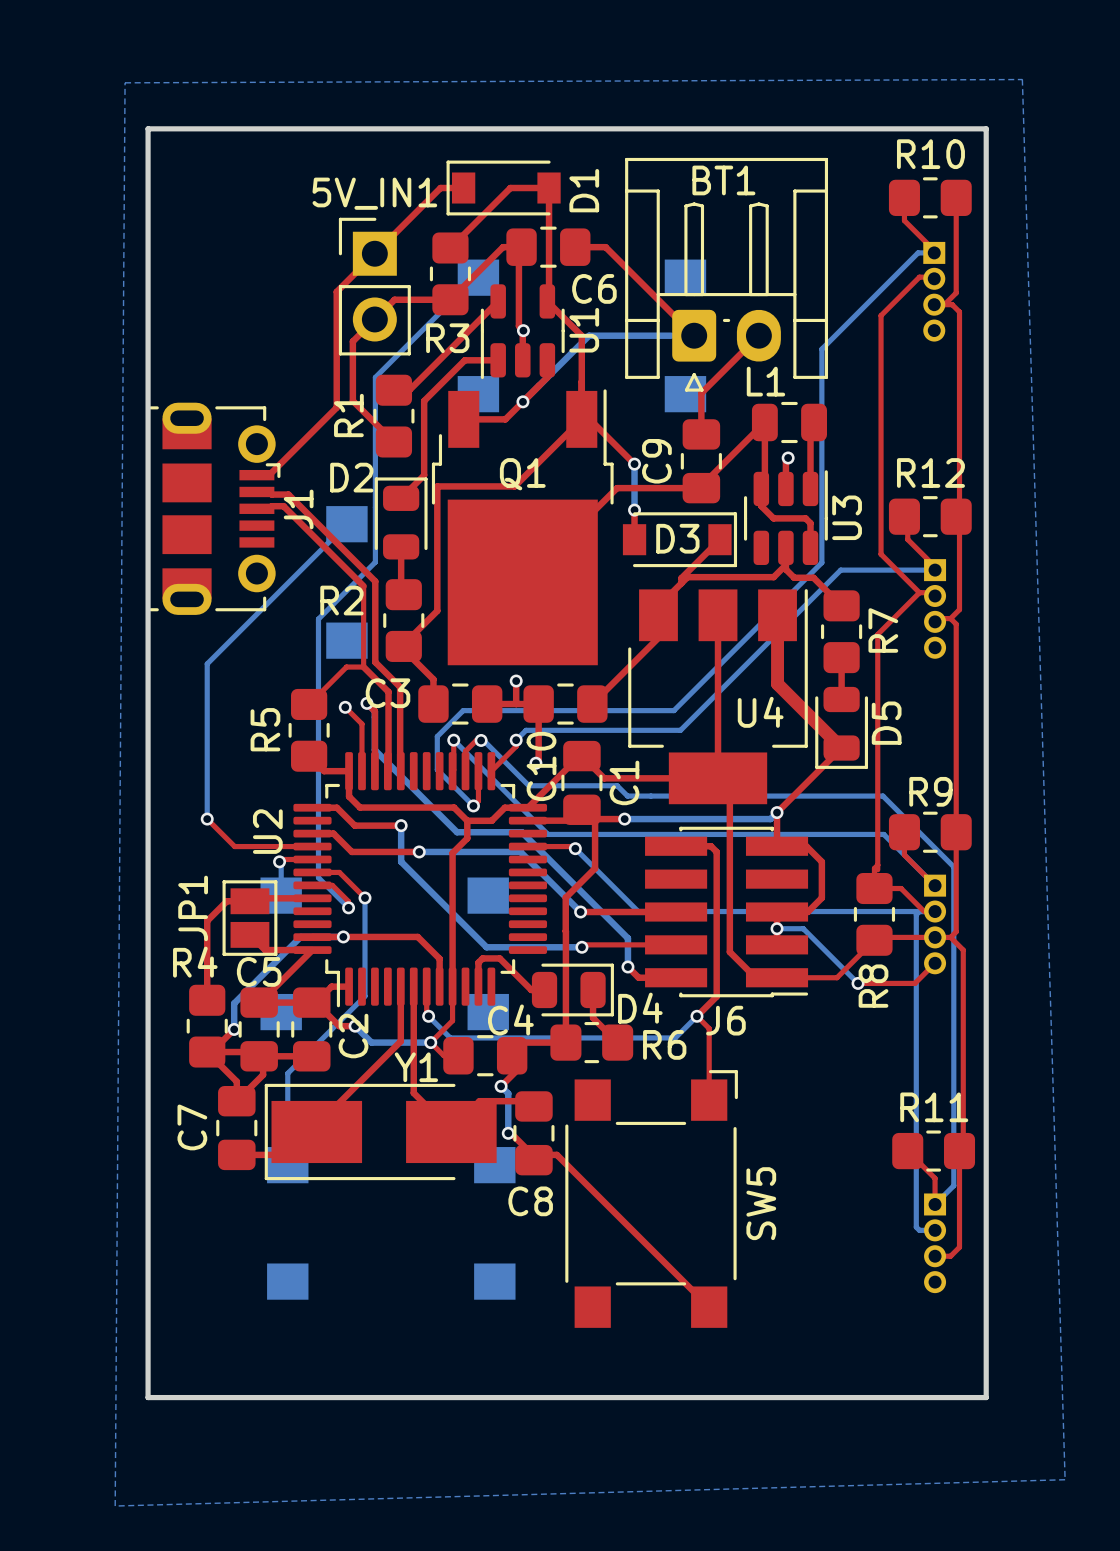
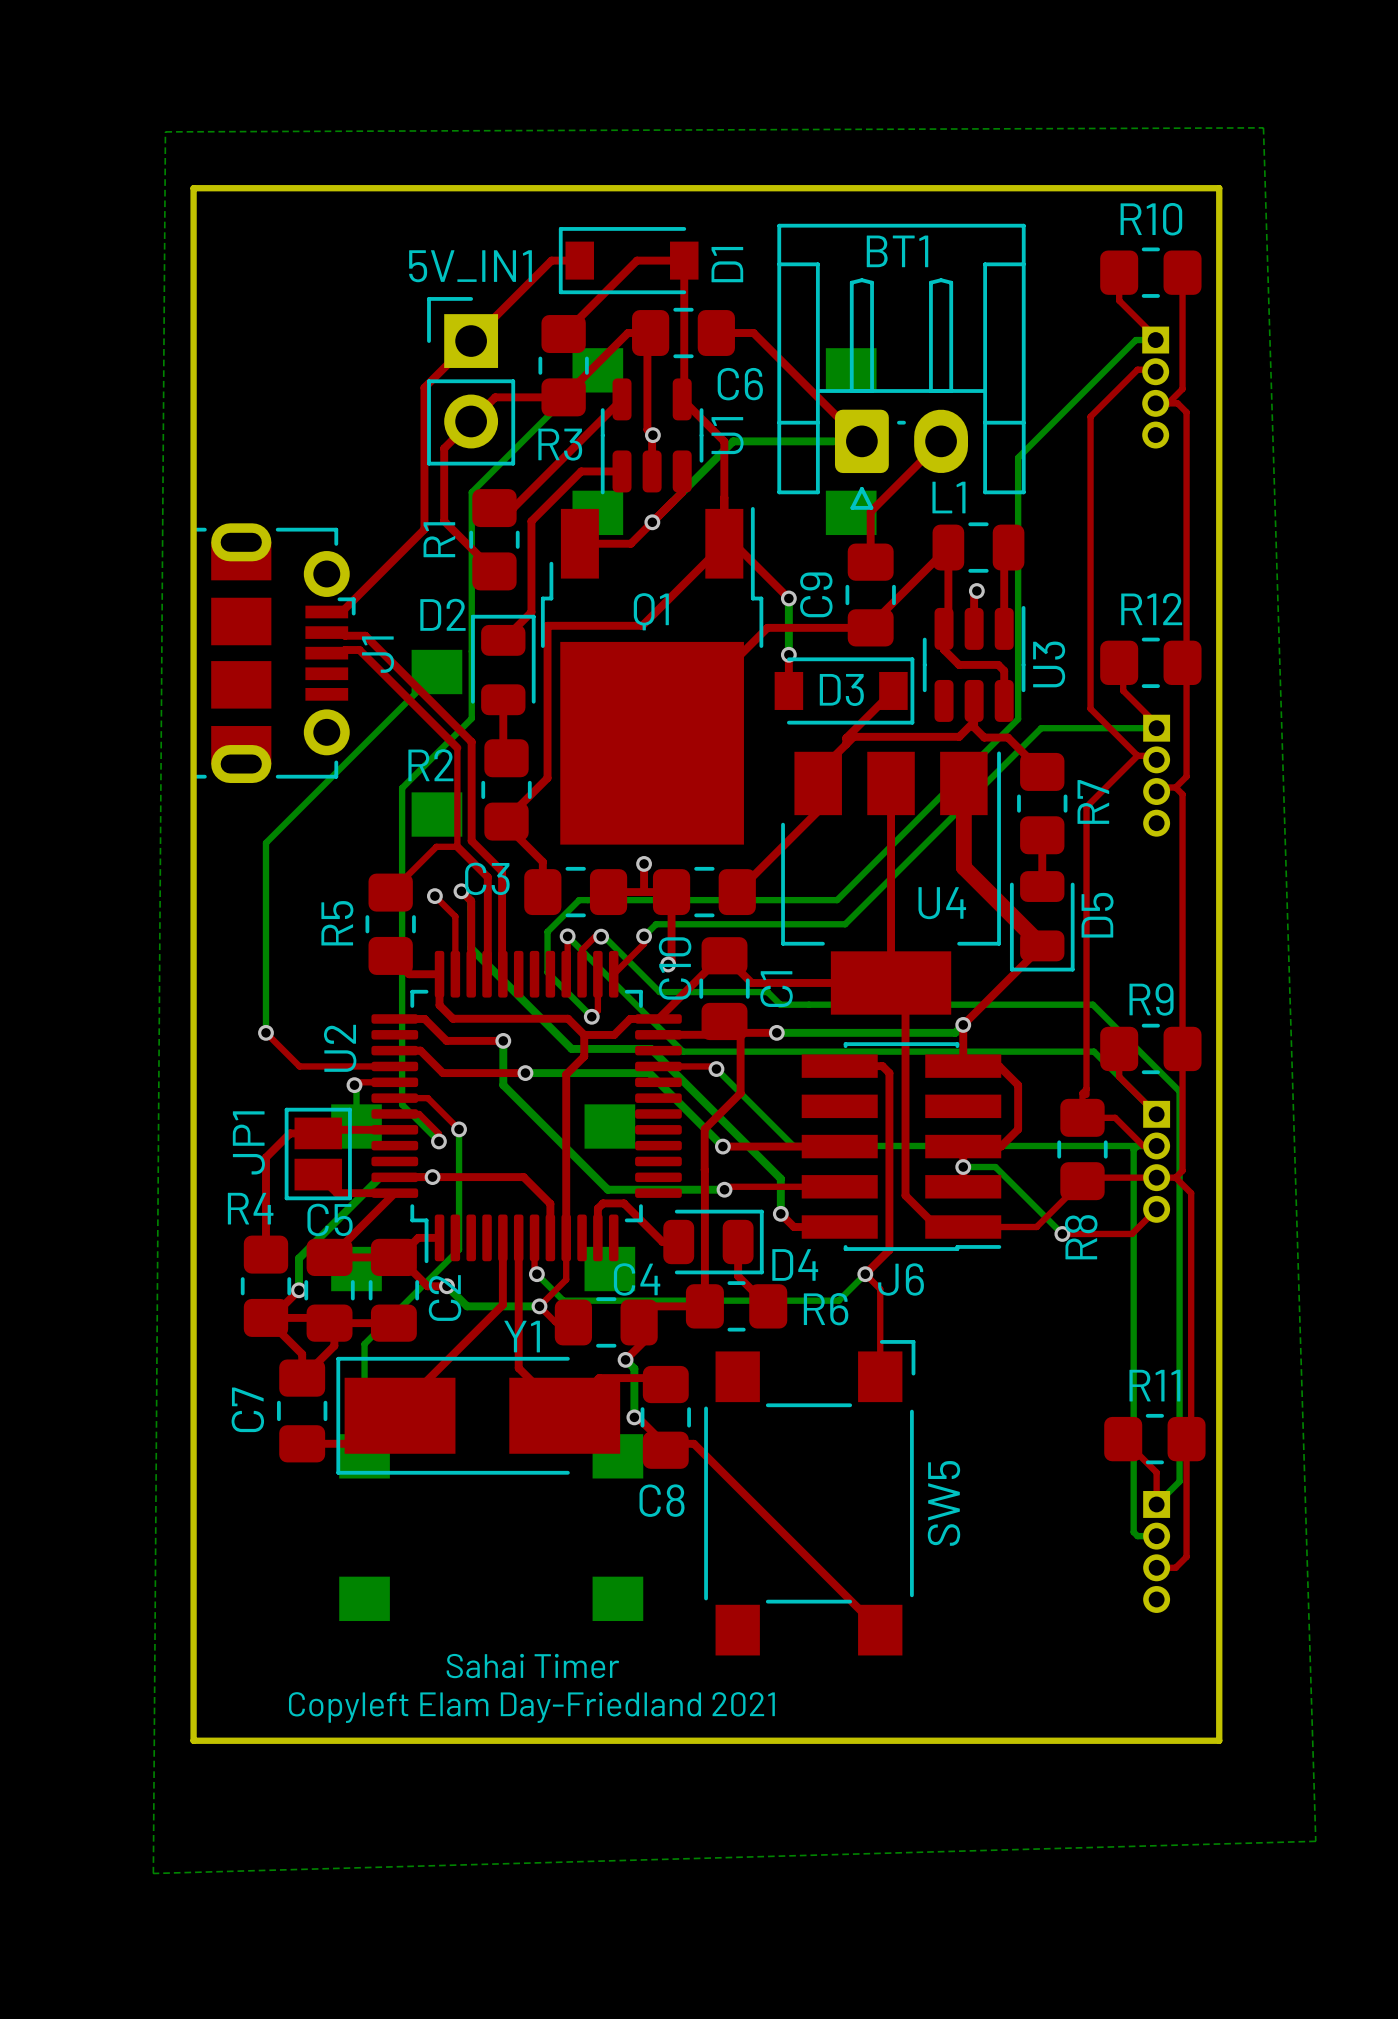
text: none -> Sahai Timer (532, 1666)
text: none -> Copyleft Elam Day-Friedland 2021 (531, 1707)

